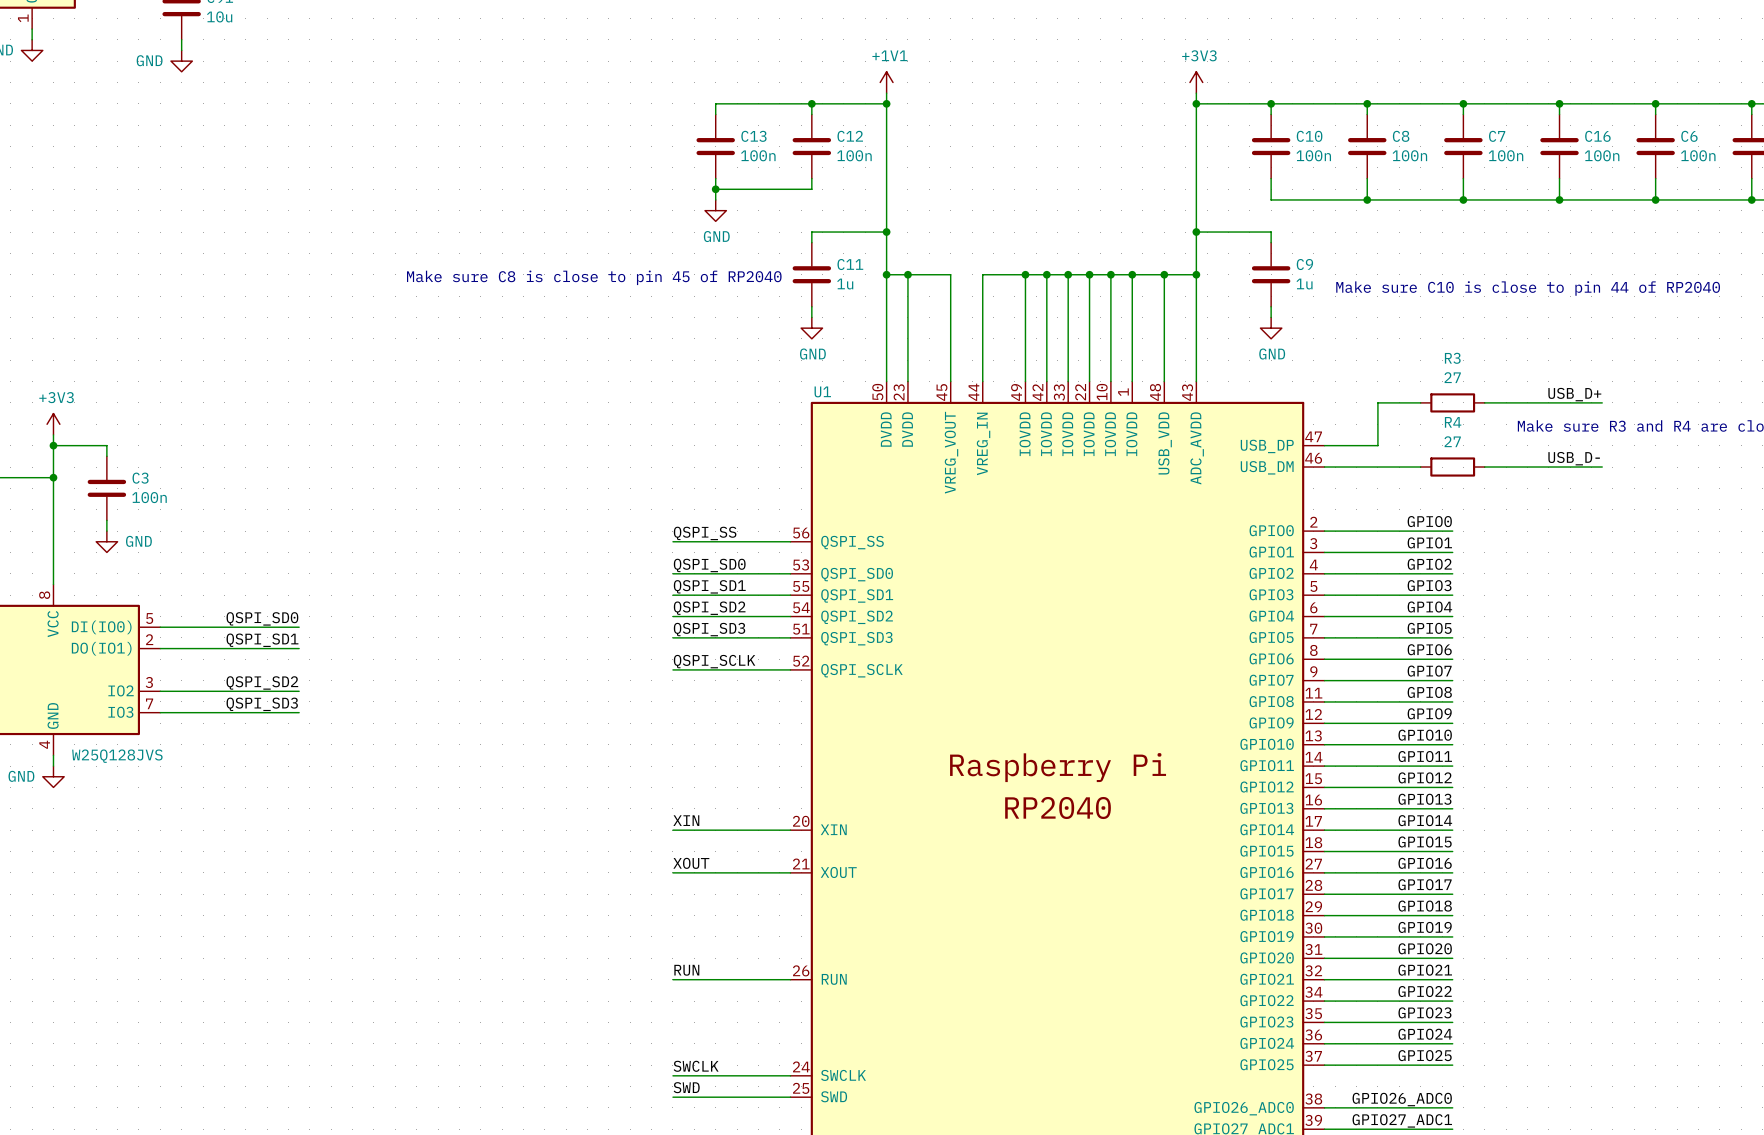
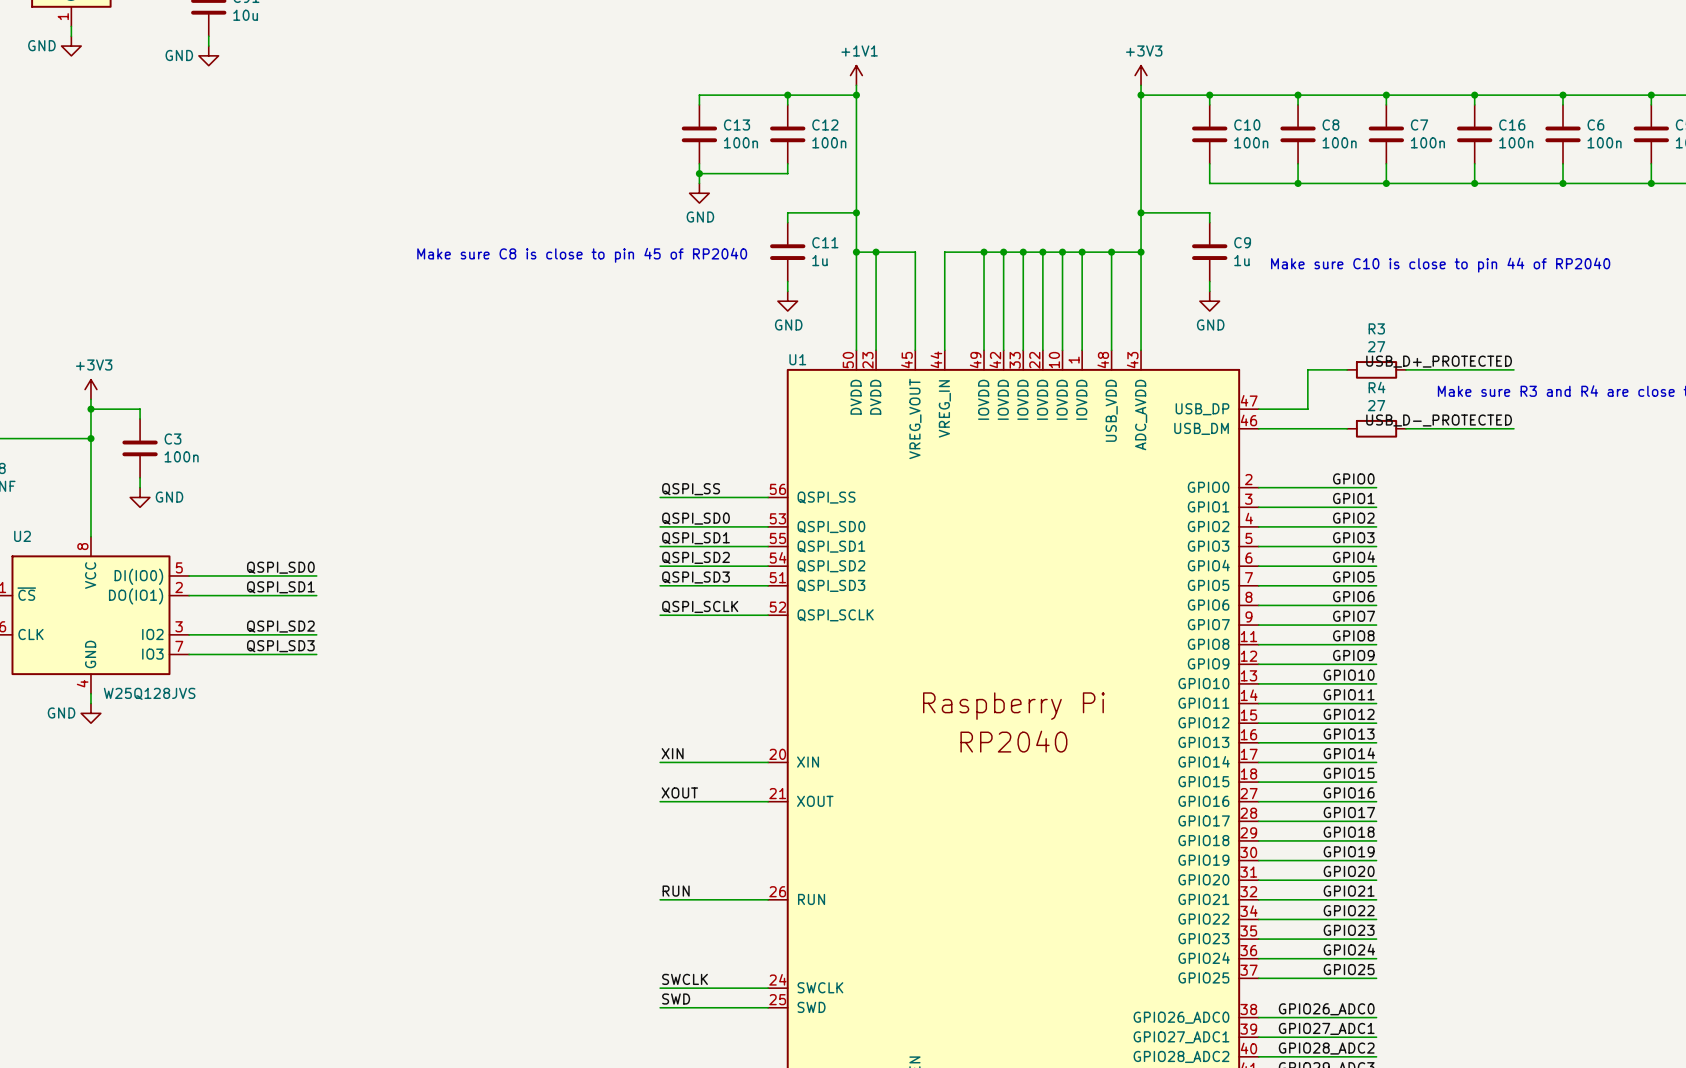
label: USB_D+ (1574, 394) -> USB_D+_PROTECTED (1439, 361)
label: USB_D- (1574, 458) -> USB_D-_PROTECTED (1439, 420)

